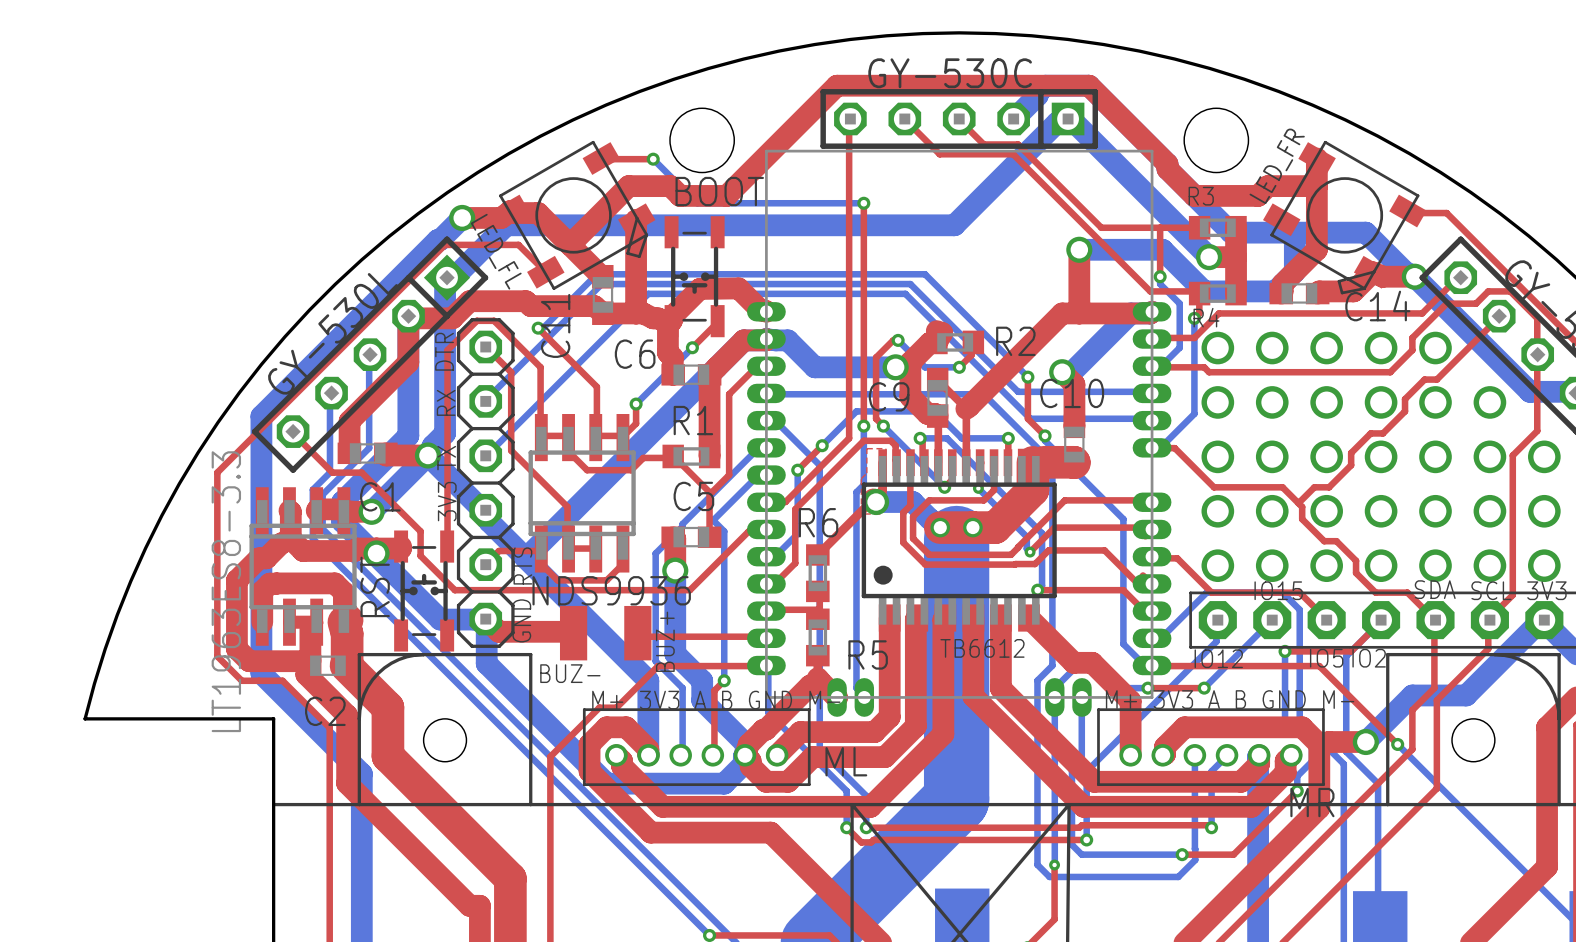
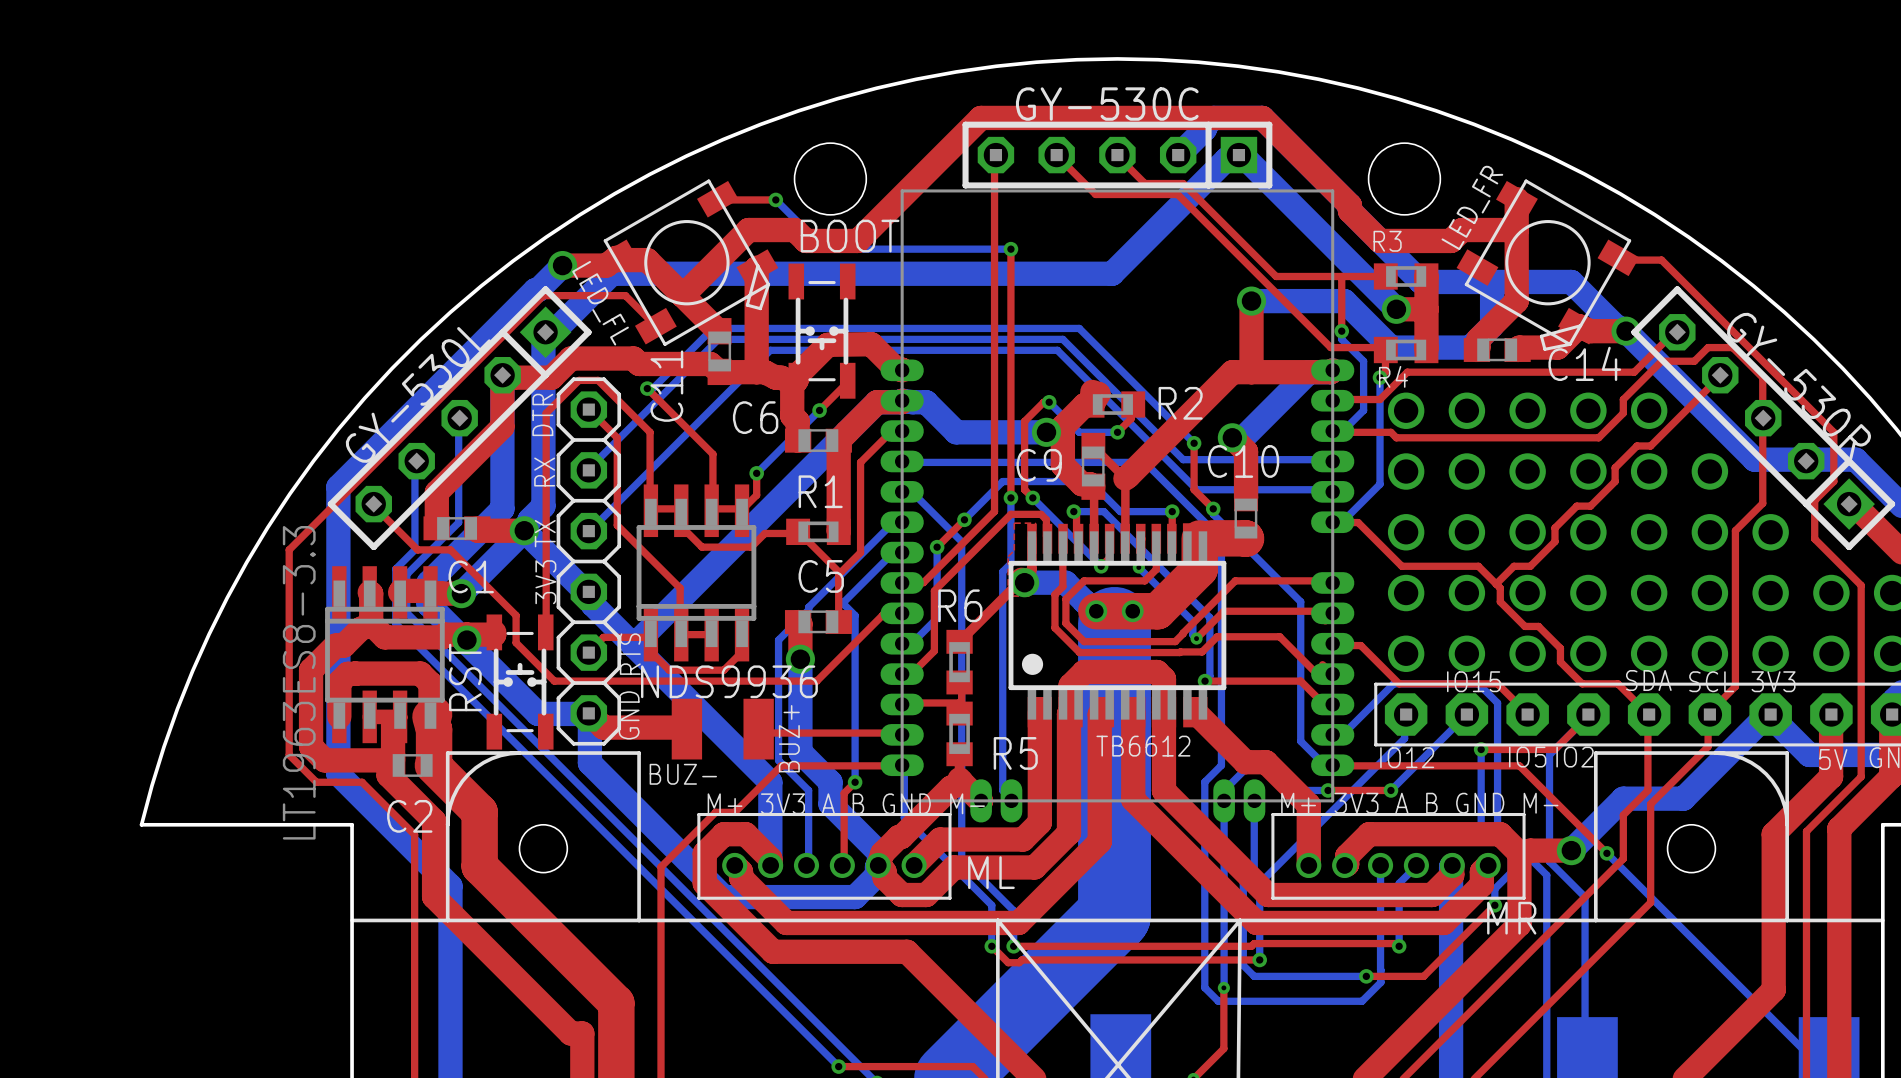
top track: none -> (1070, 712) (1070, 685) (1084, 672) (1157, 672) (1163, 678) (1163, 712)

